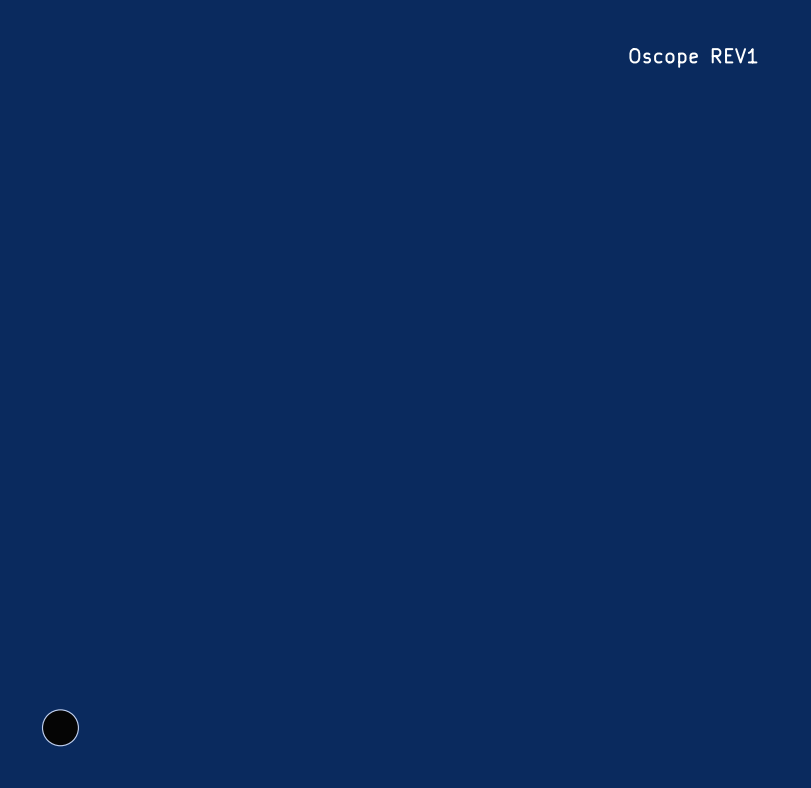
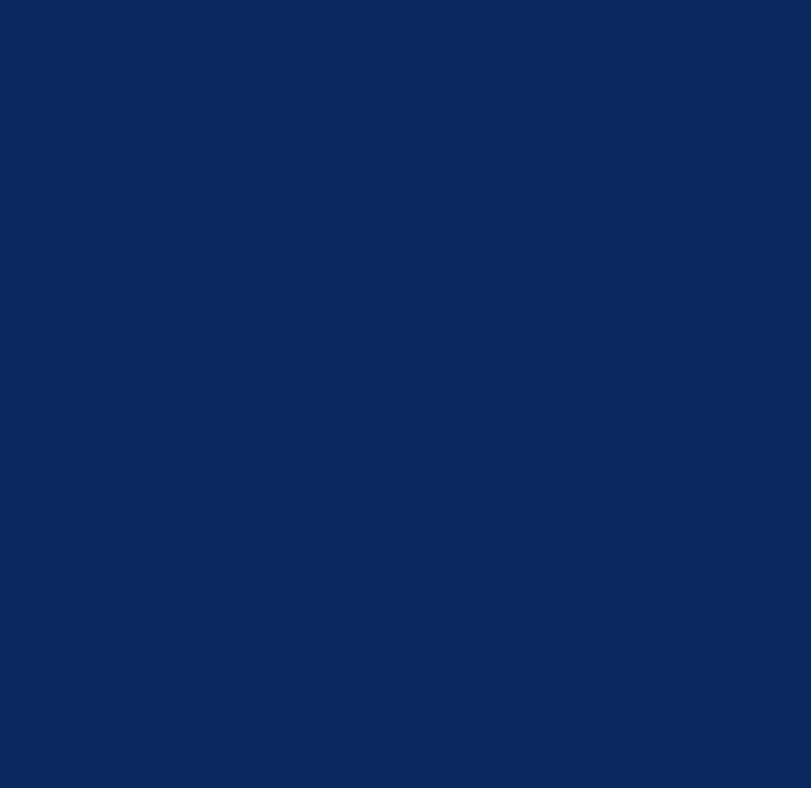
text: Oscope REV1 (693, 57) -> none
part: (60, 727) -> none

